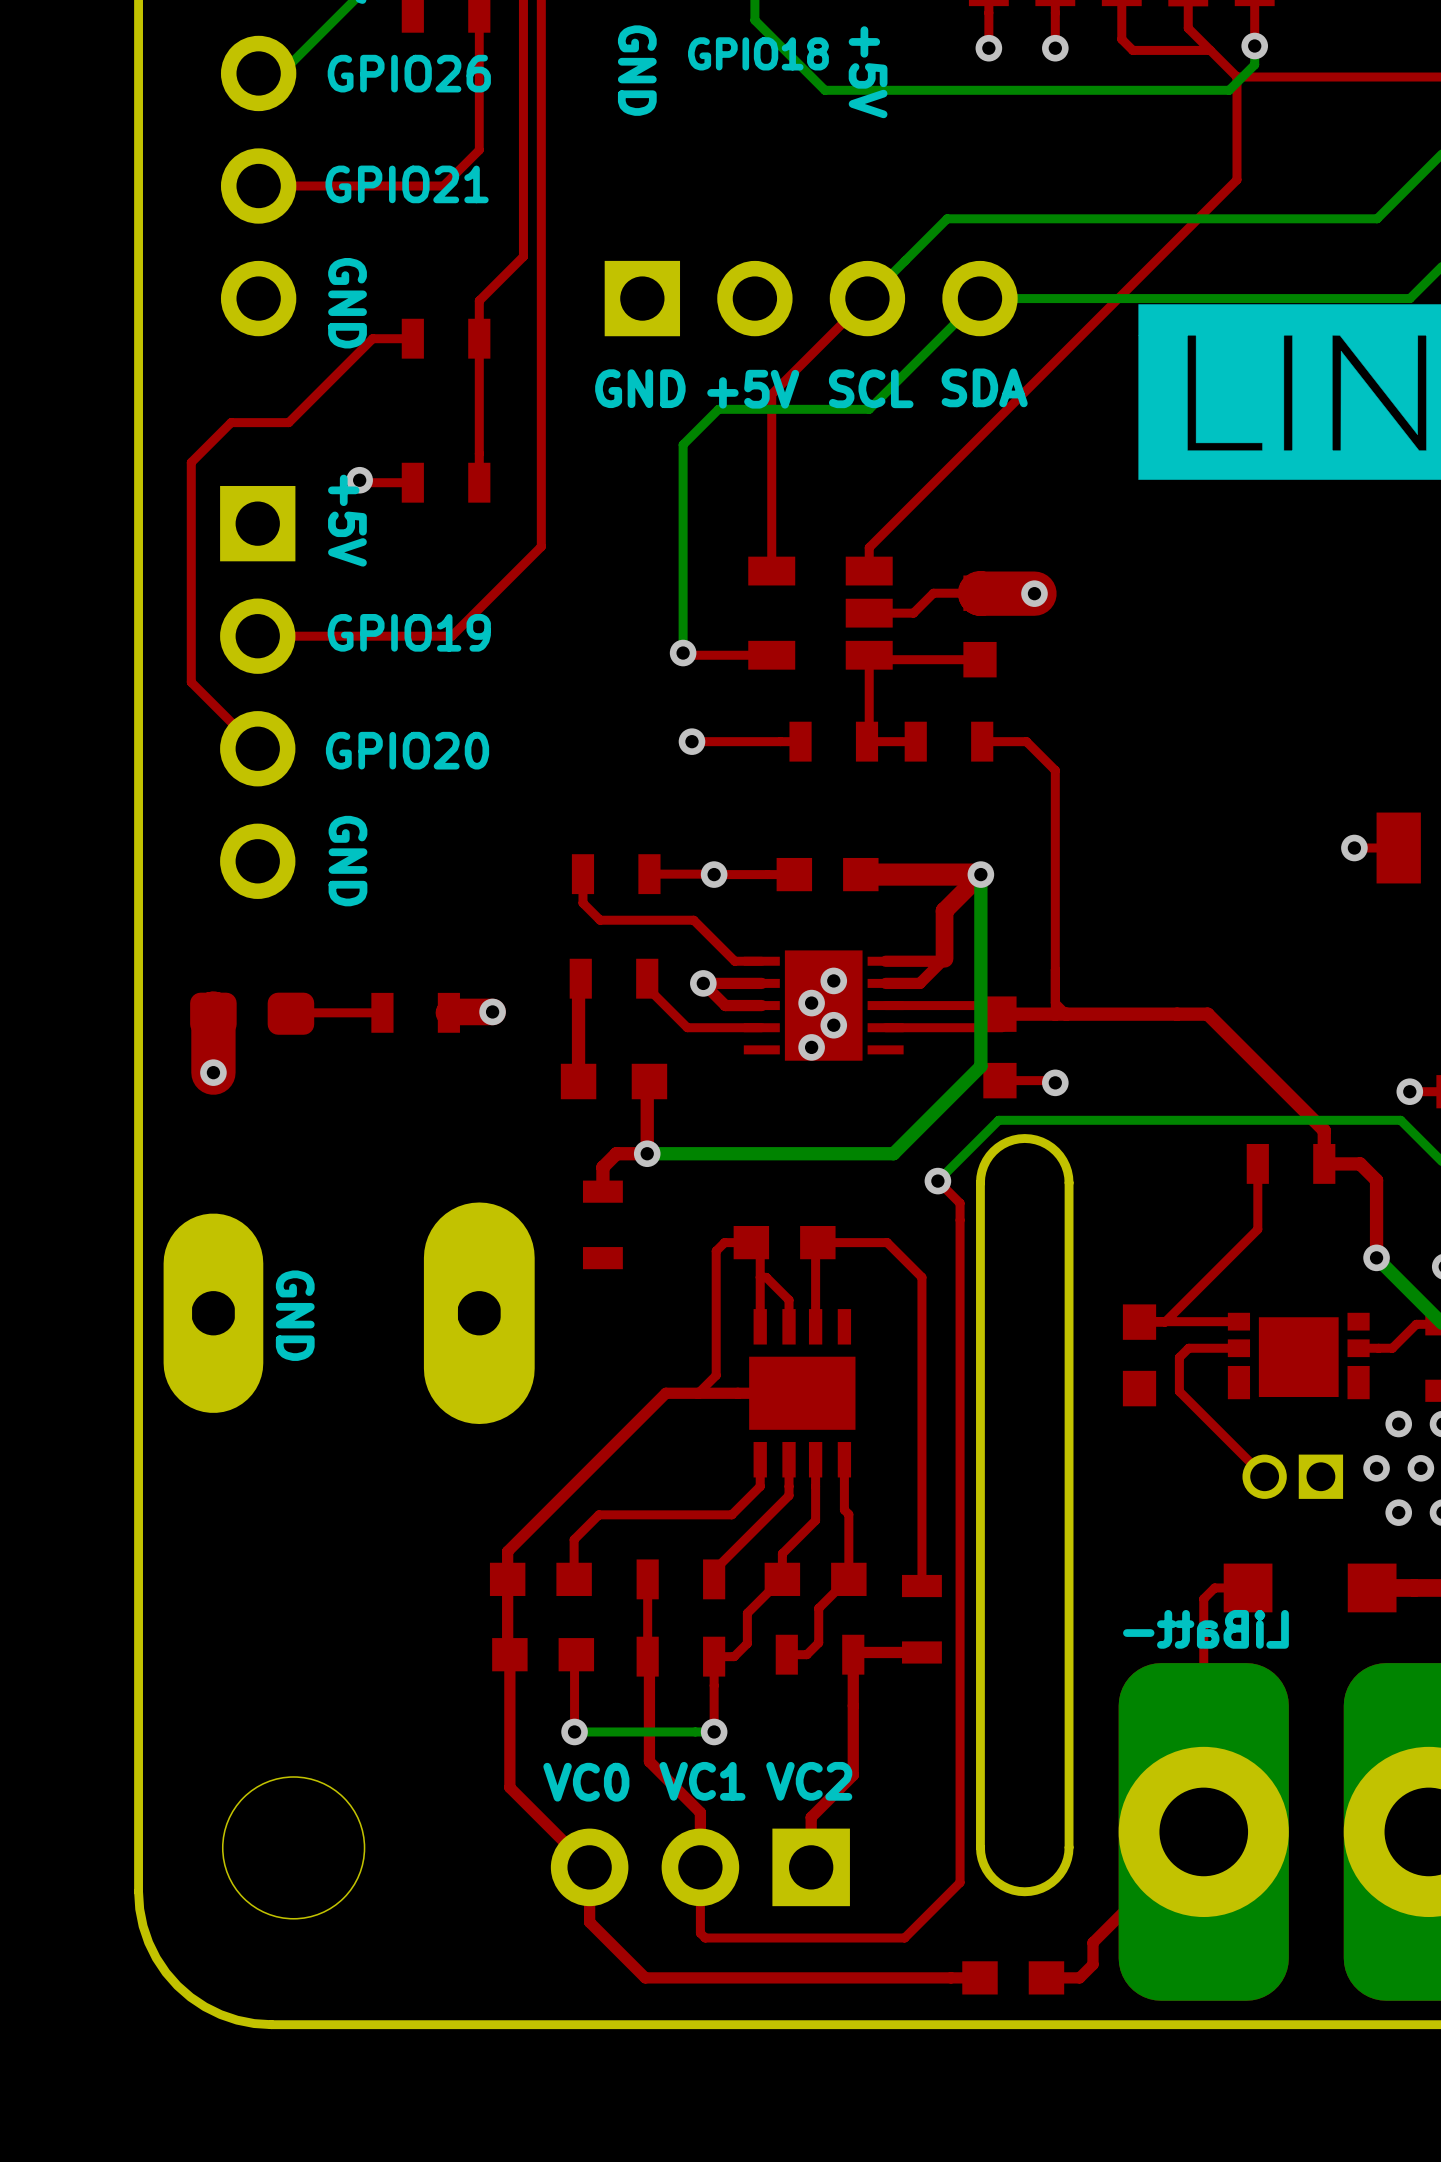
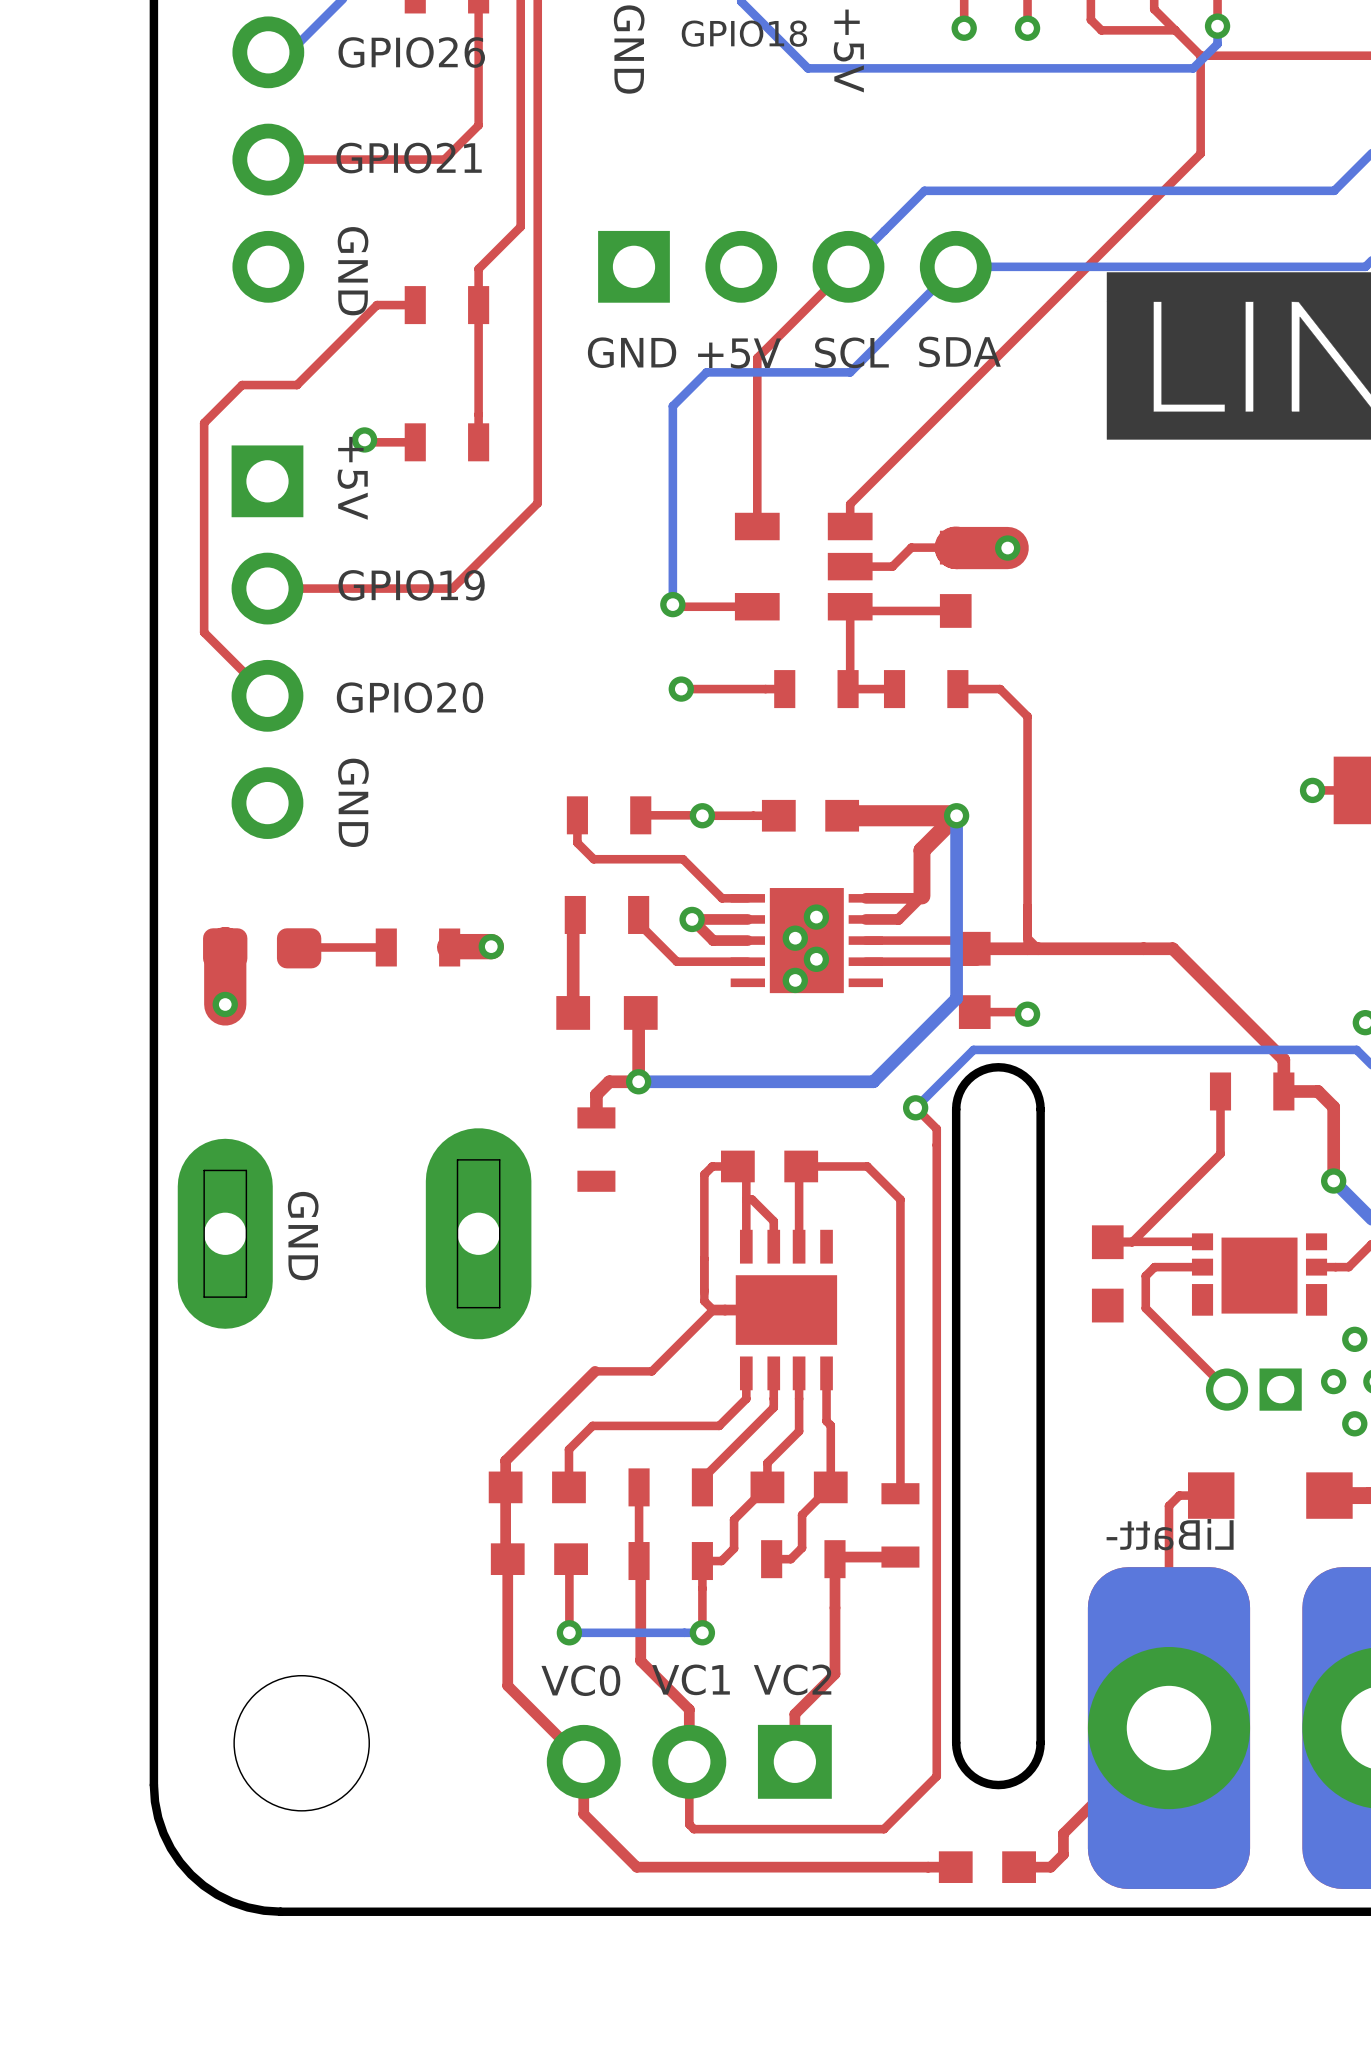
top track: (716, 1375) (698, 1393) -> none
top track: (725, 1393) (665, 1393) (601, 1457) -> (704, 1258) (704, 1301) (713, 1310) (651, 1371) (595, 1371)

